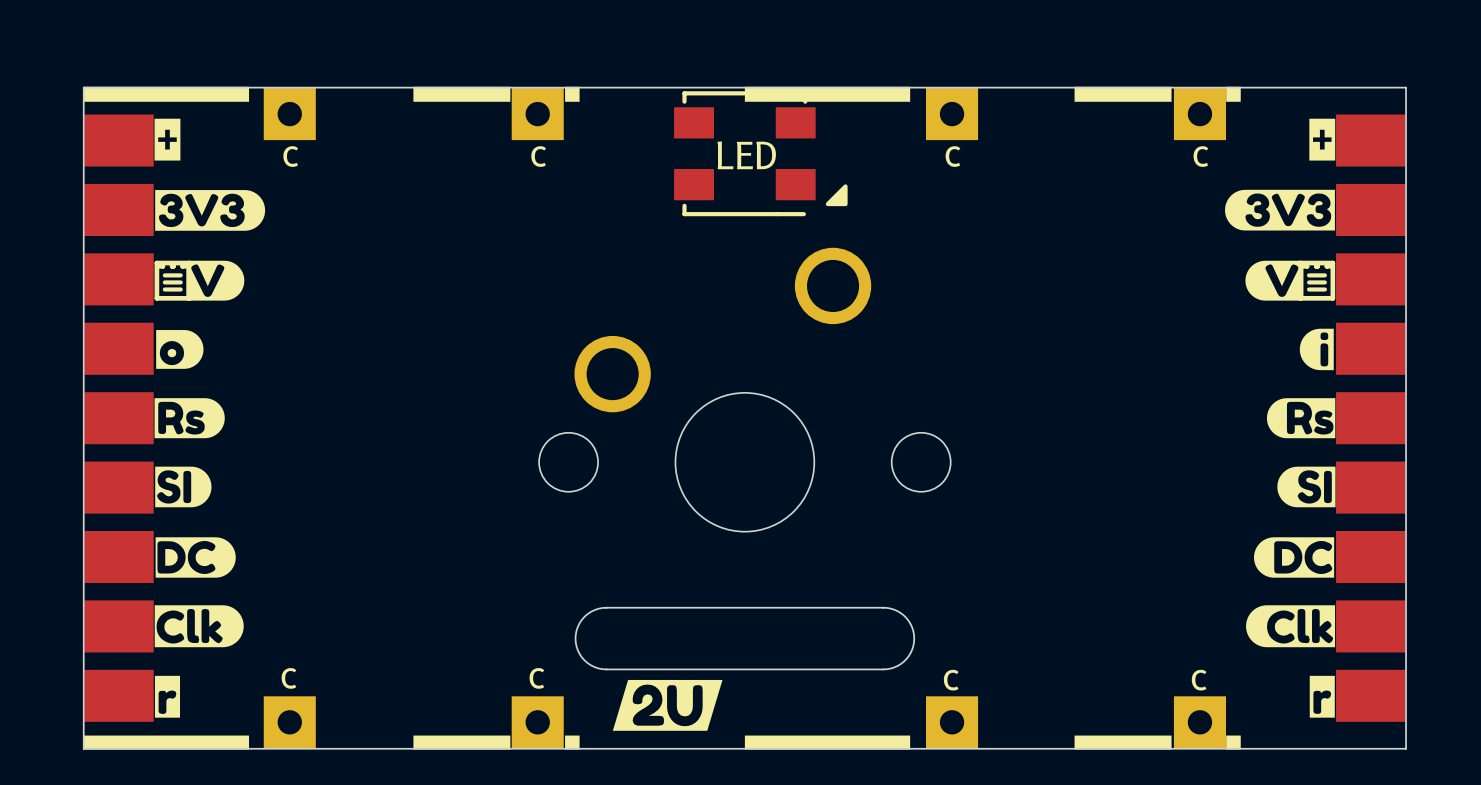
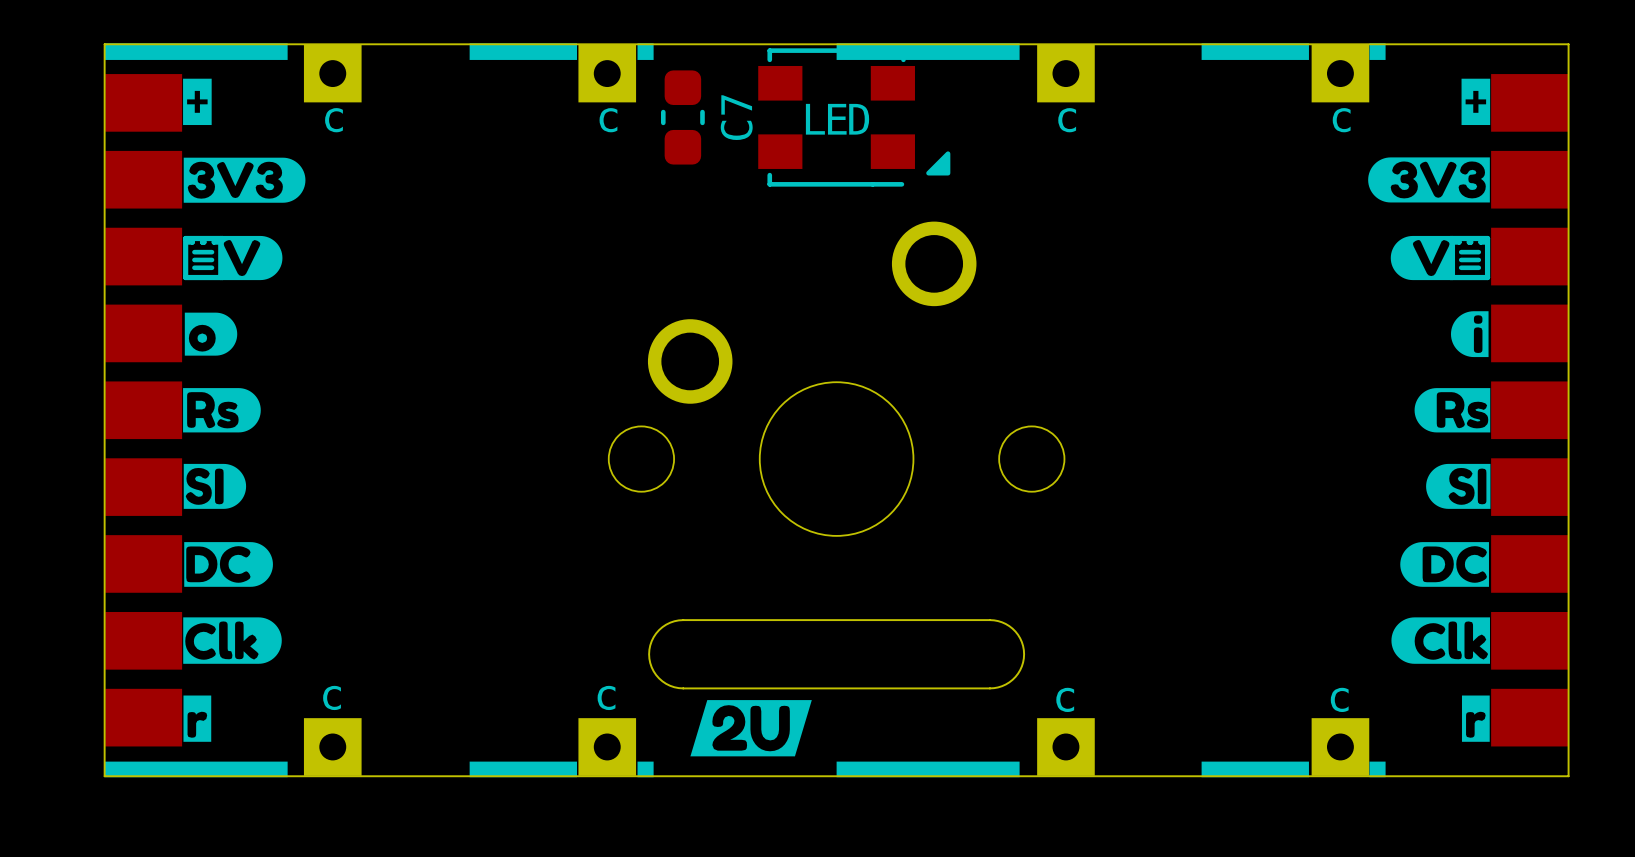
C7: none -> (682, 117)

